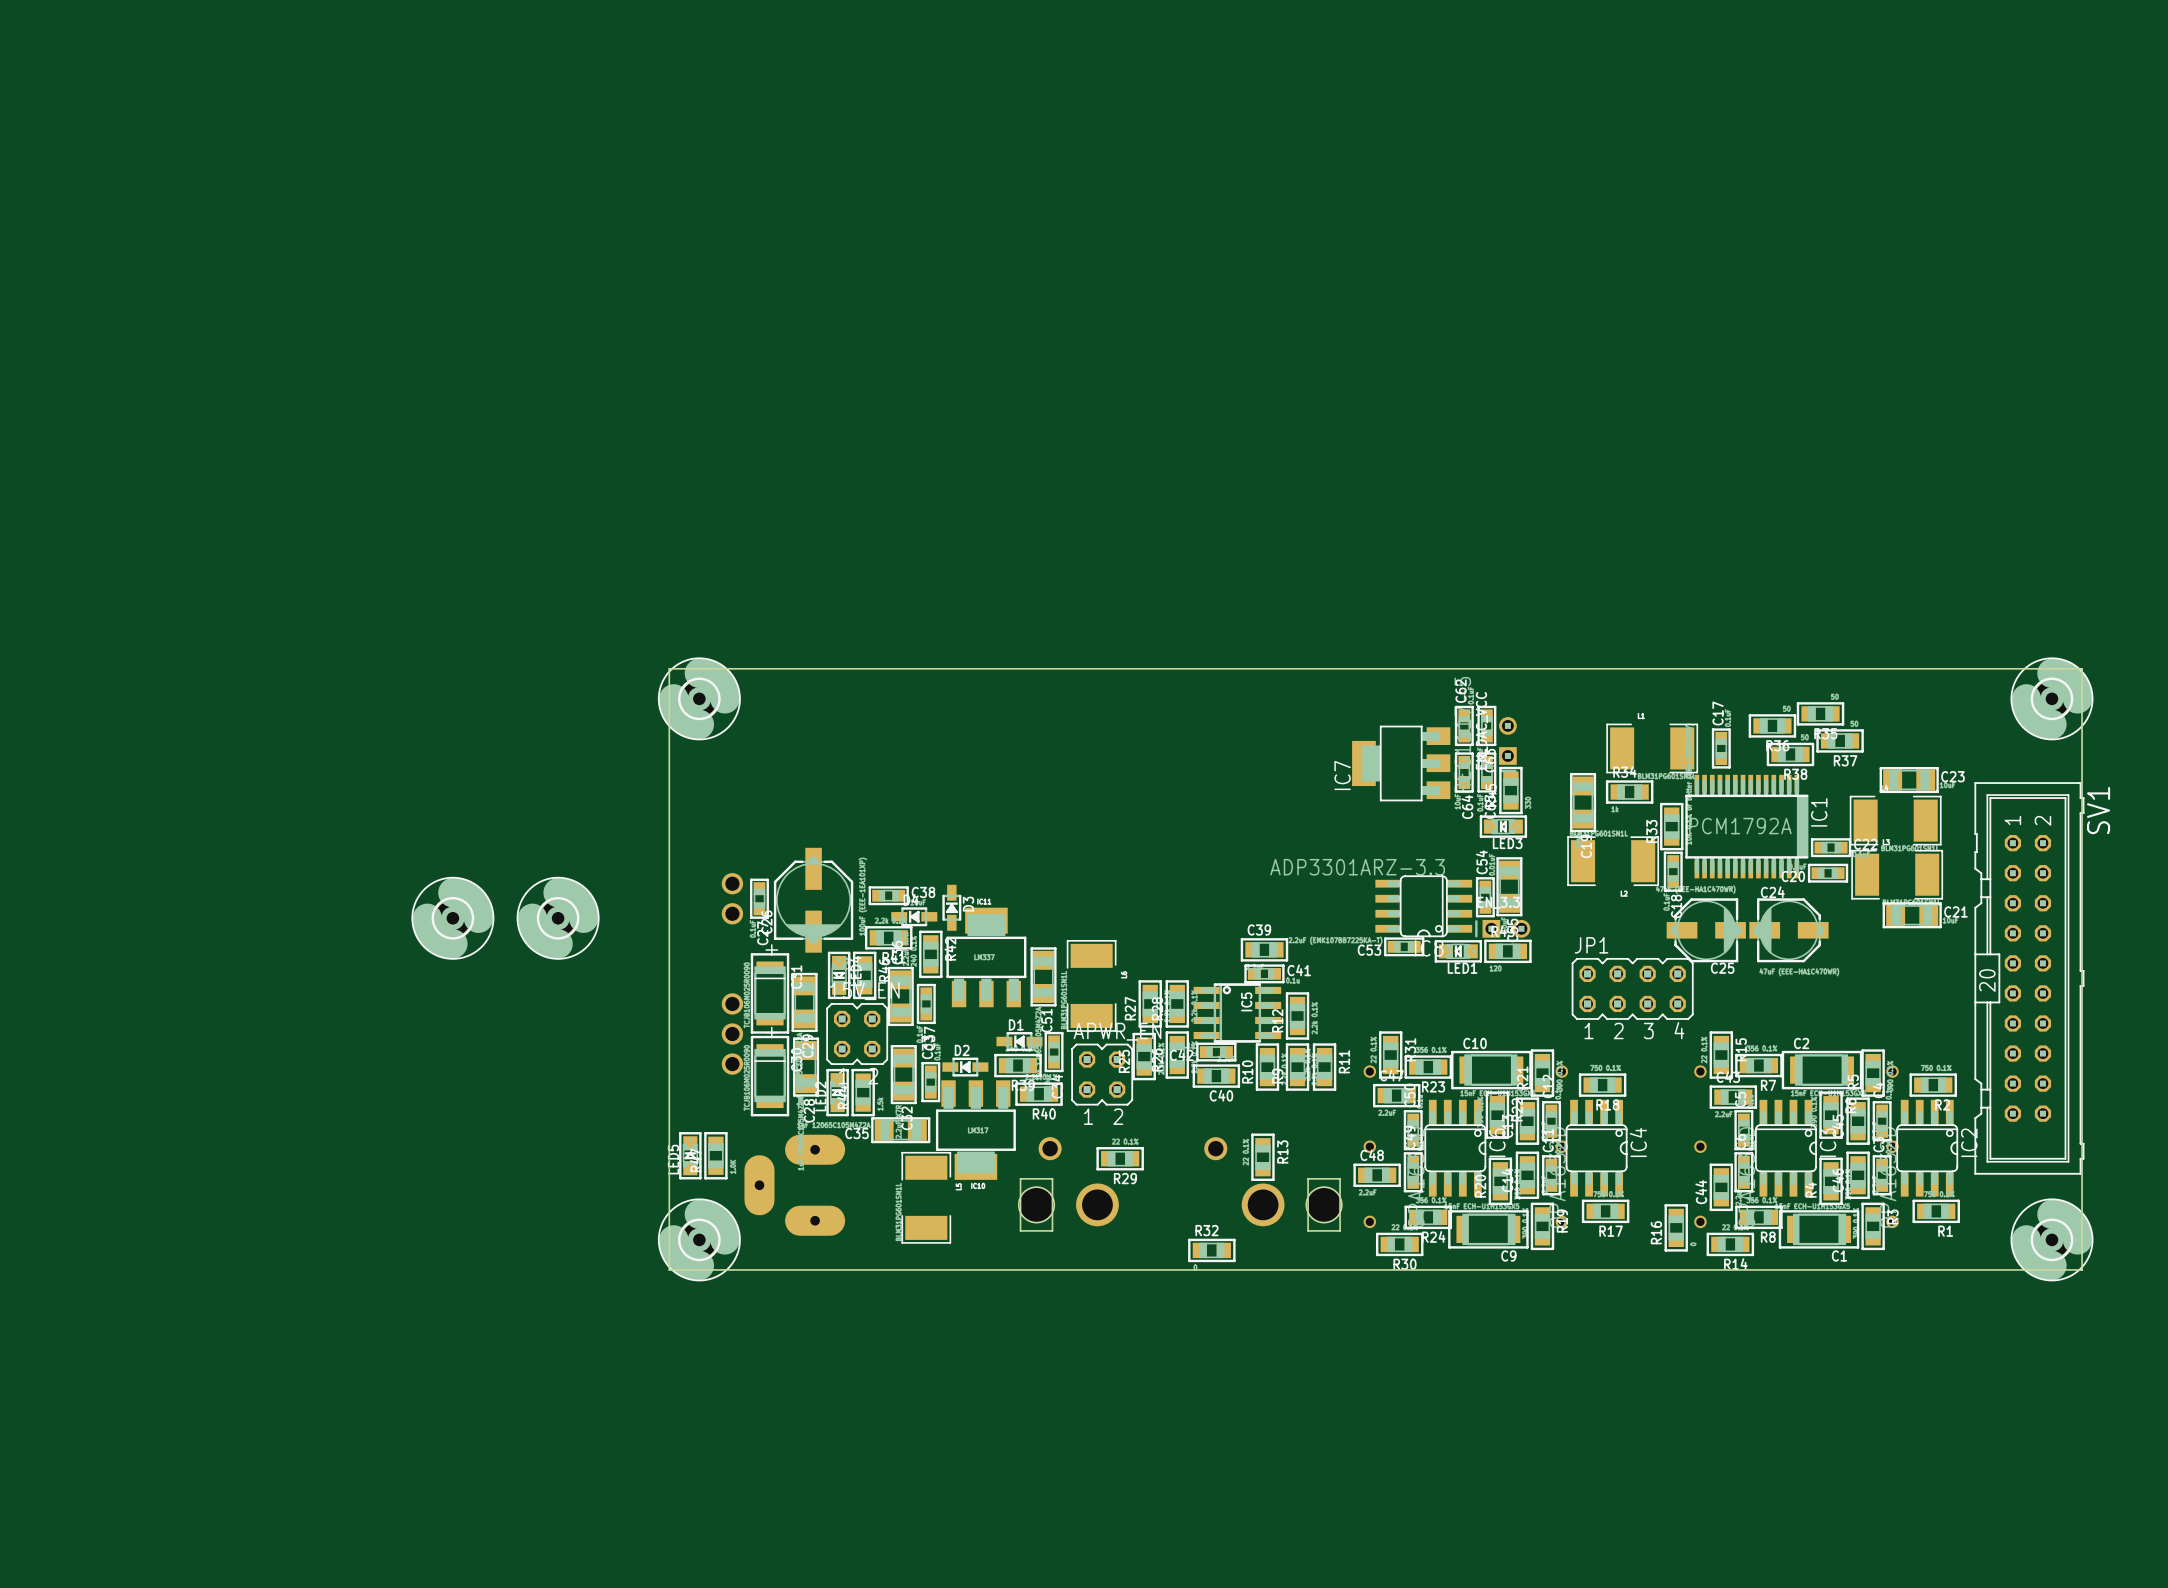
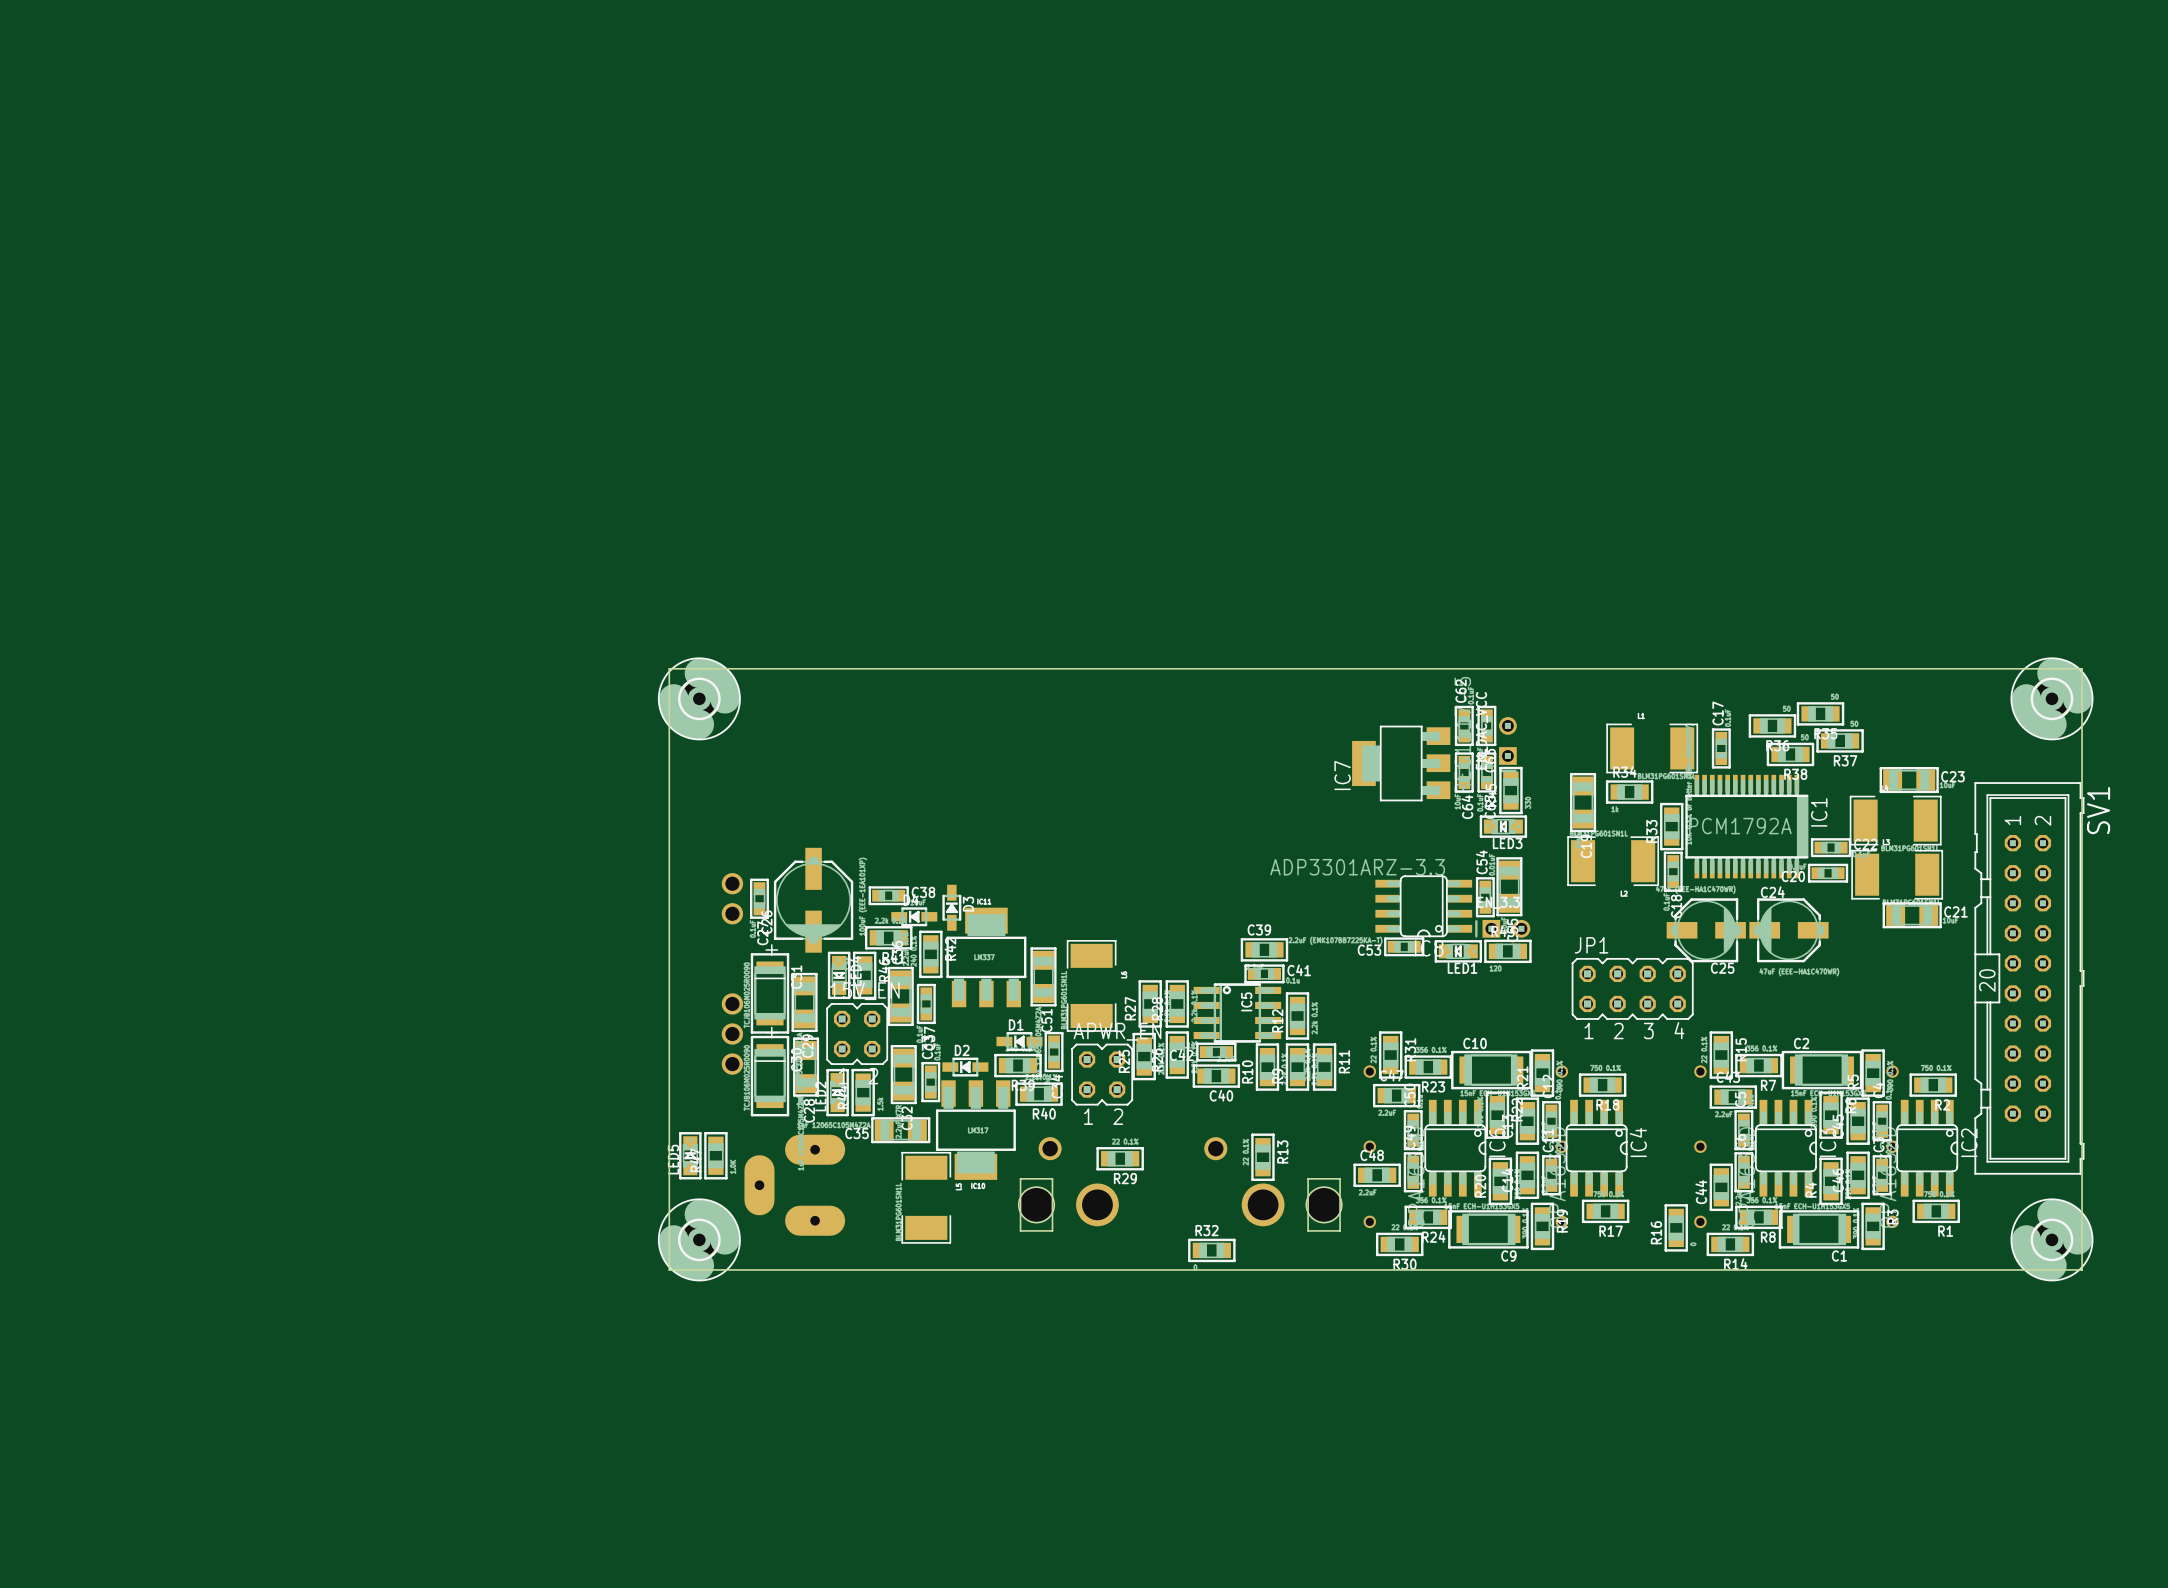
part: (452, 918) -> none
part: (558, 918) -> none

